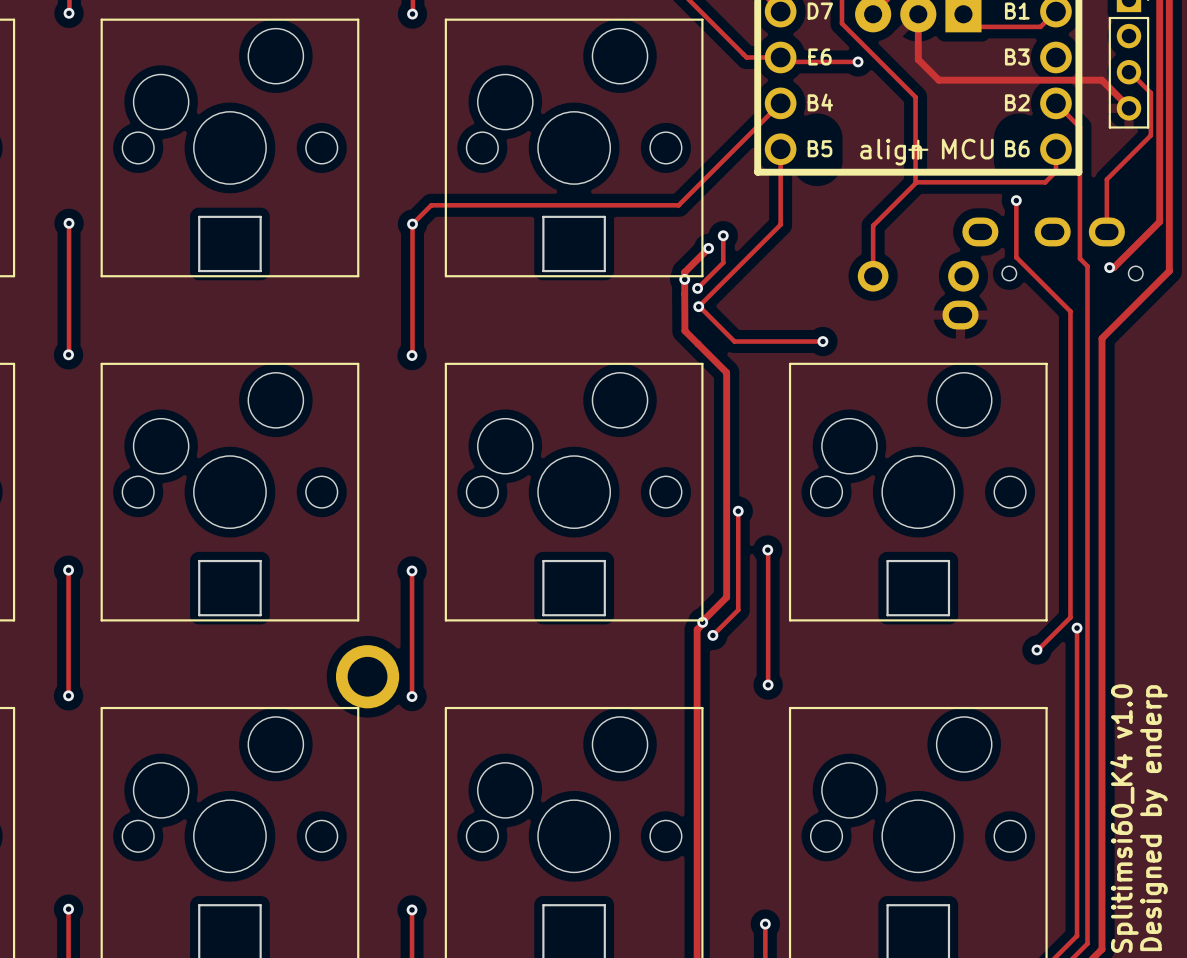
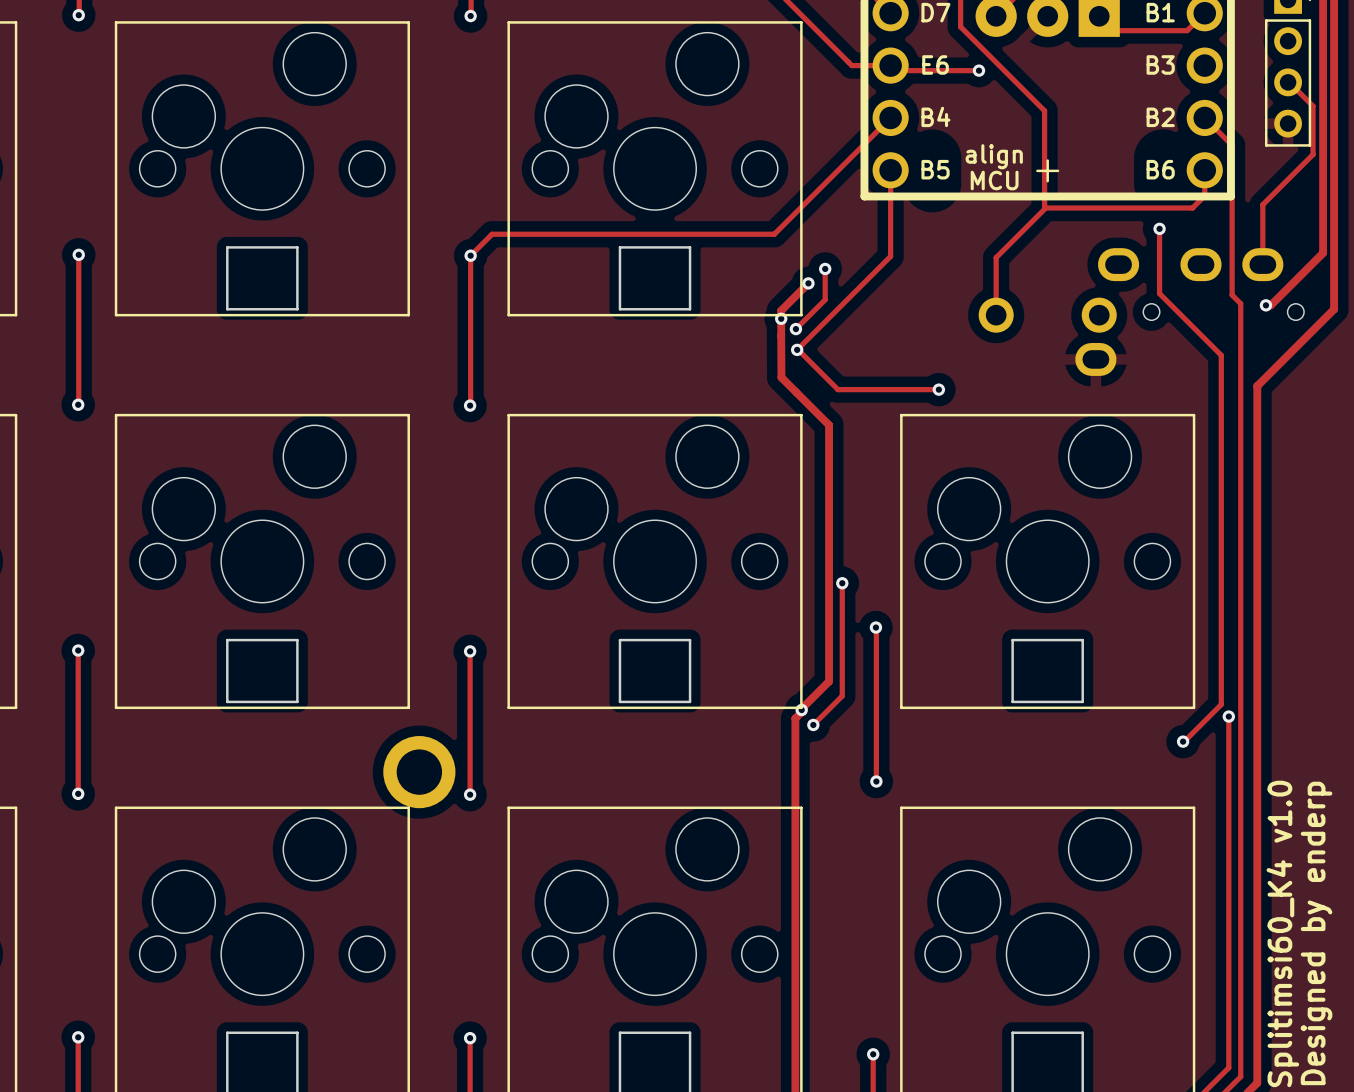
track: (918, 14) (918, 59) (938, 80) (1101, 80) (1130, 108) -> none
text: align MCU (926, 152) -> align (994, 156)
text: none -> MCU (994, 180)

